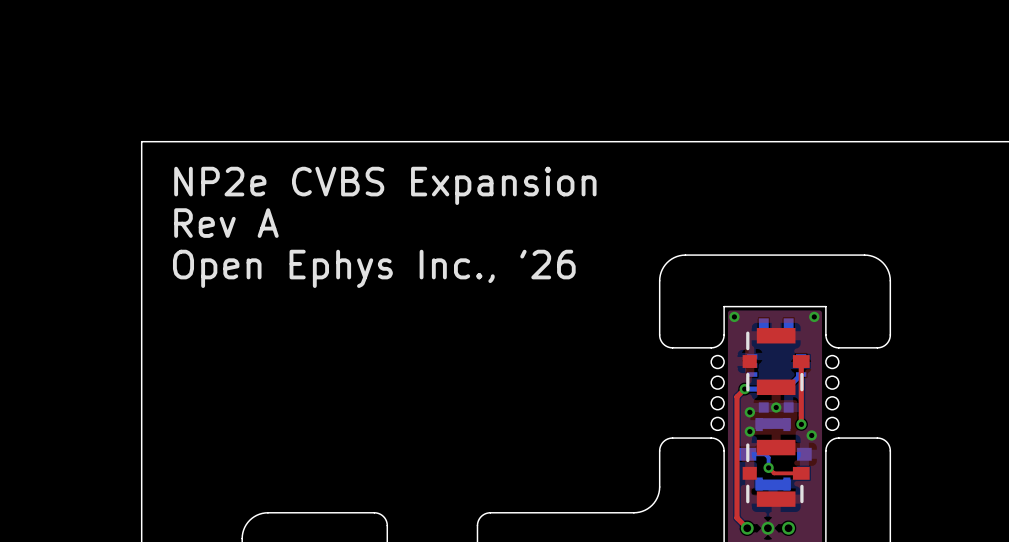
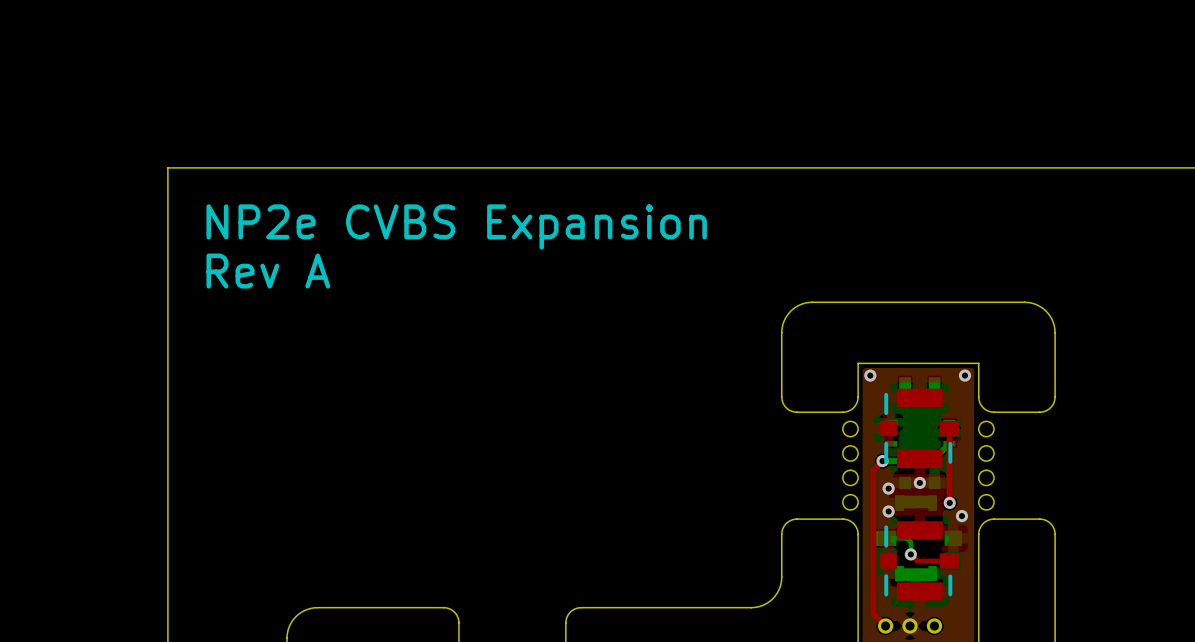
text: NP2e CVBS Expansion (385, 185) -> none
text: Rev A (226, 223) -> NP2e CVBS Expansion (456, 226)
text: Open Ephys Inc., '26 (374, 268) -> Rev A (268, 271)

